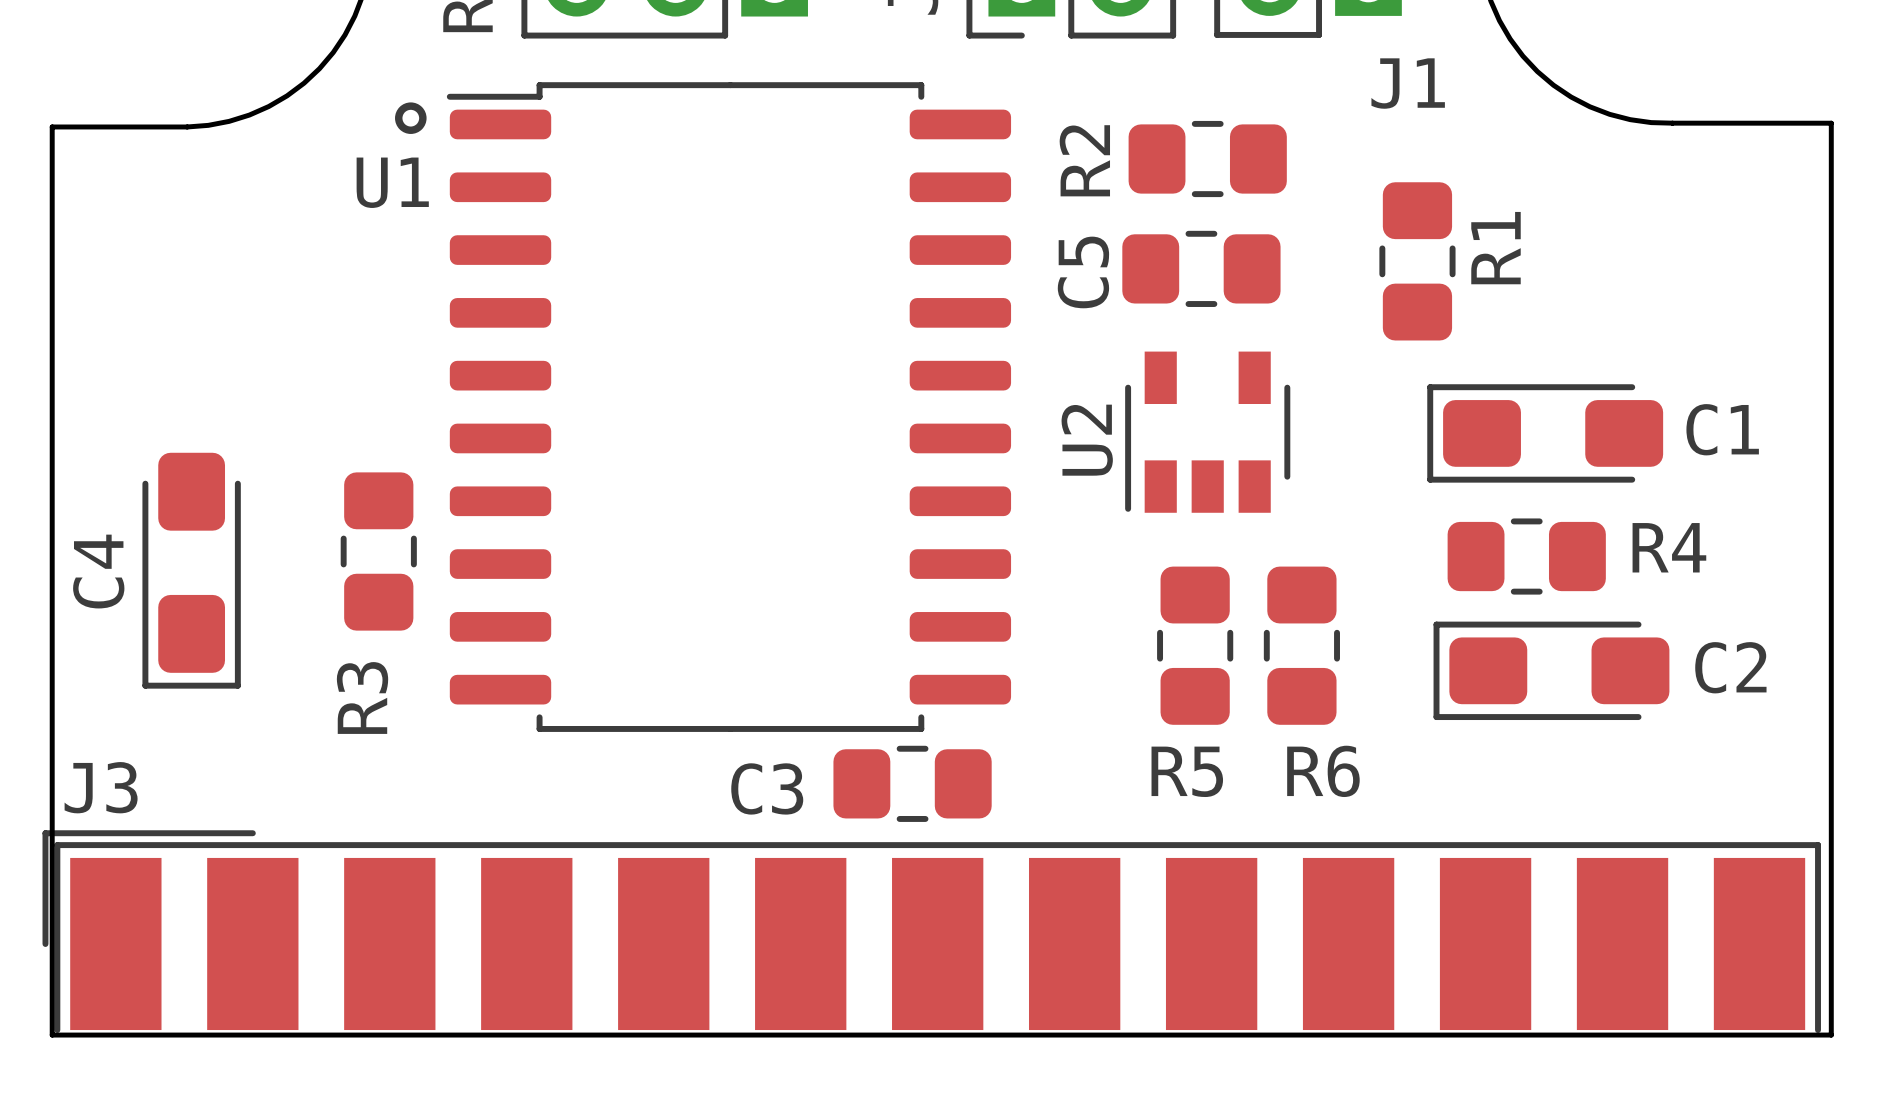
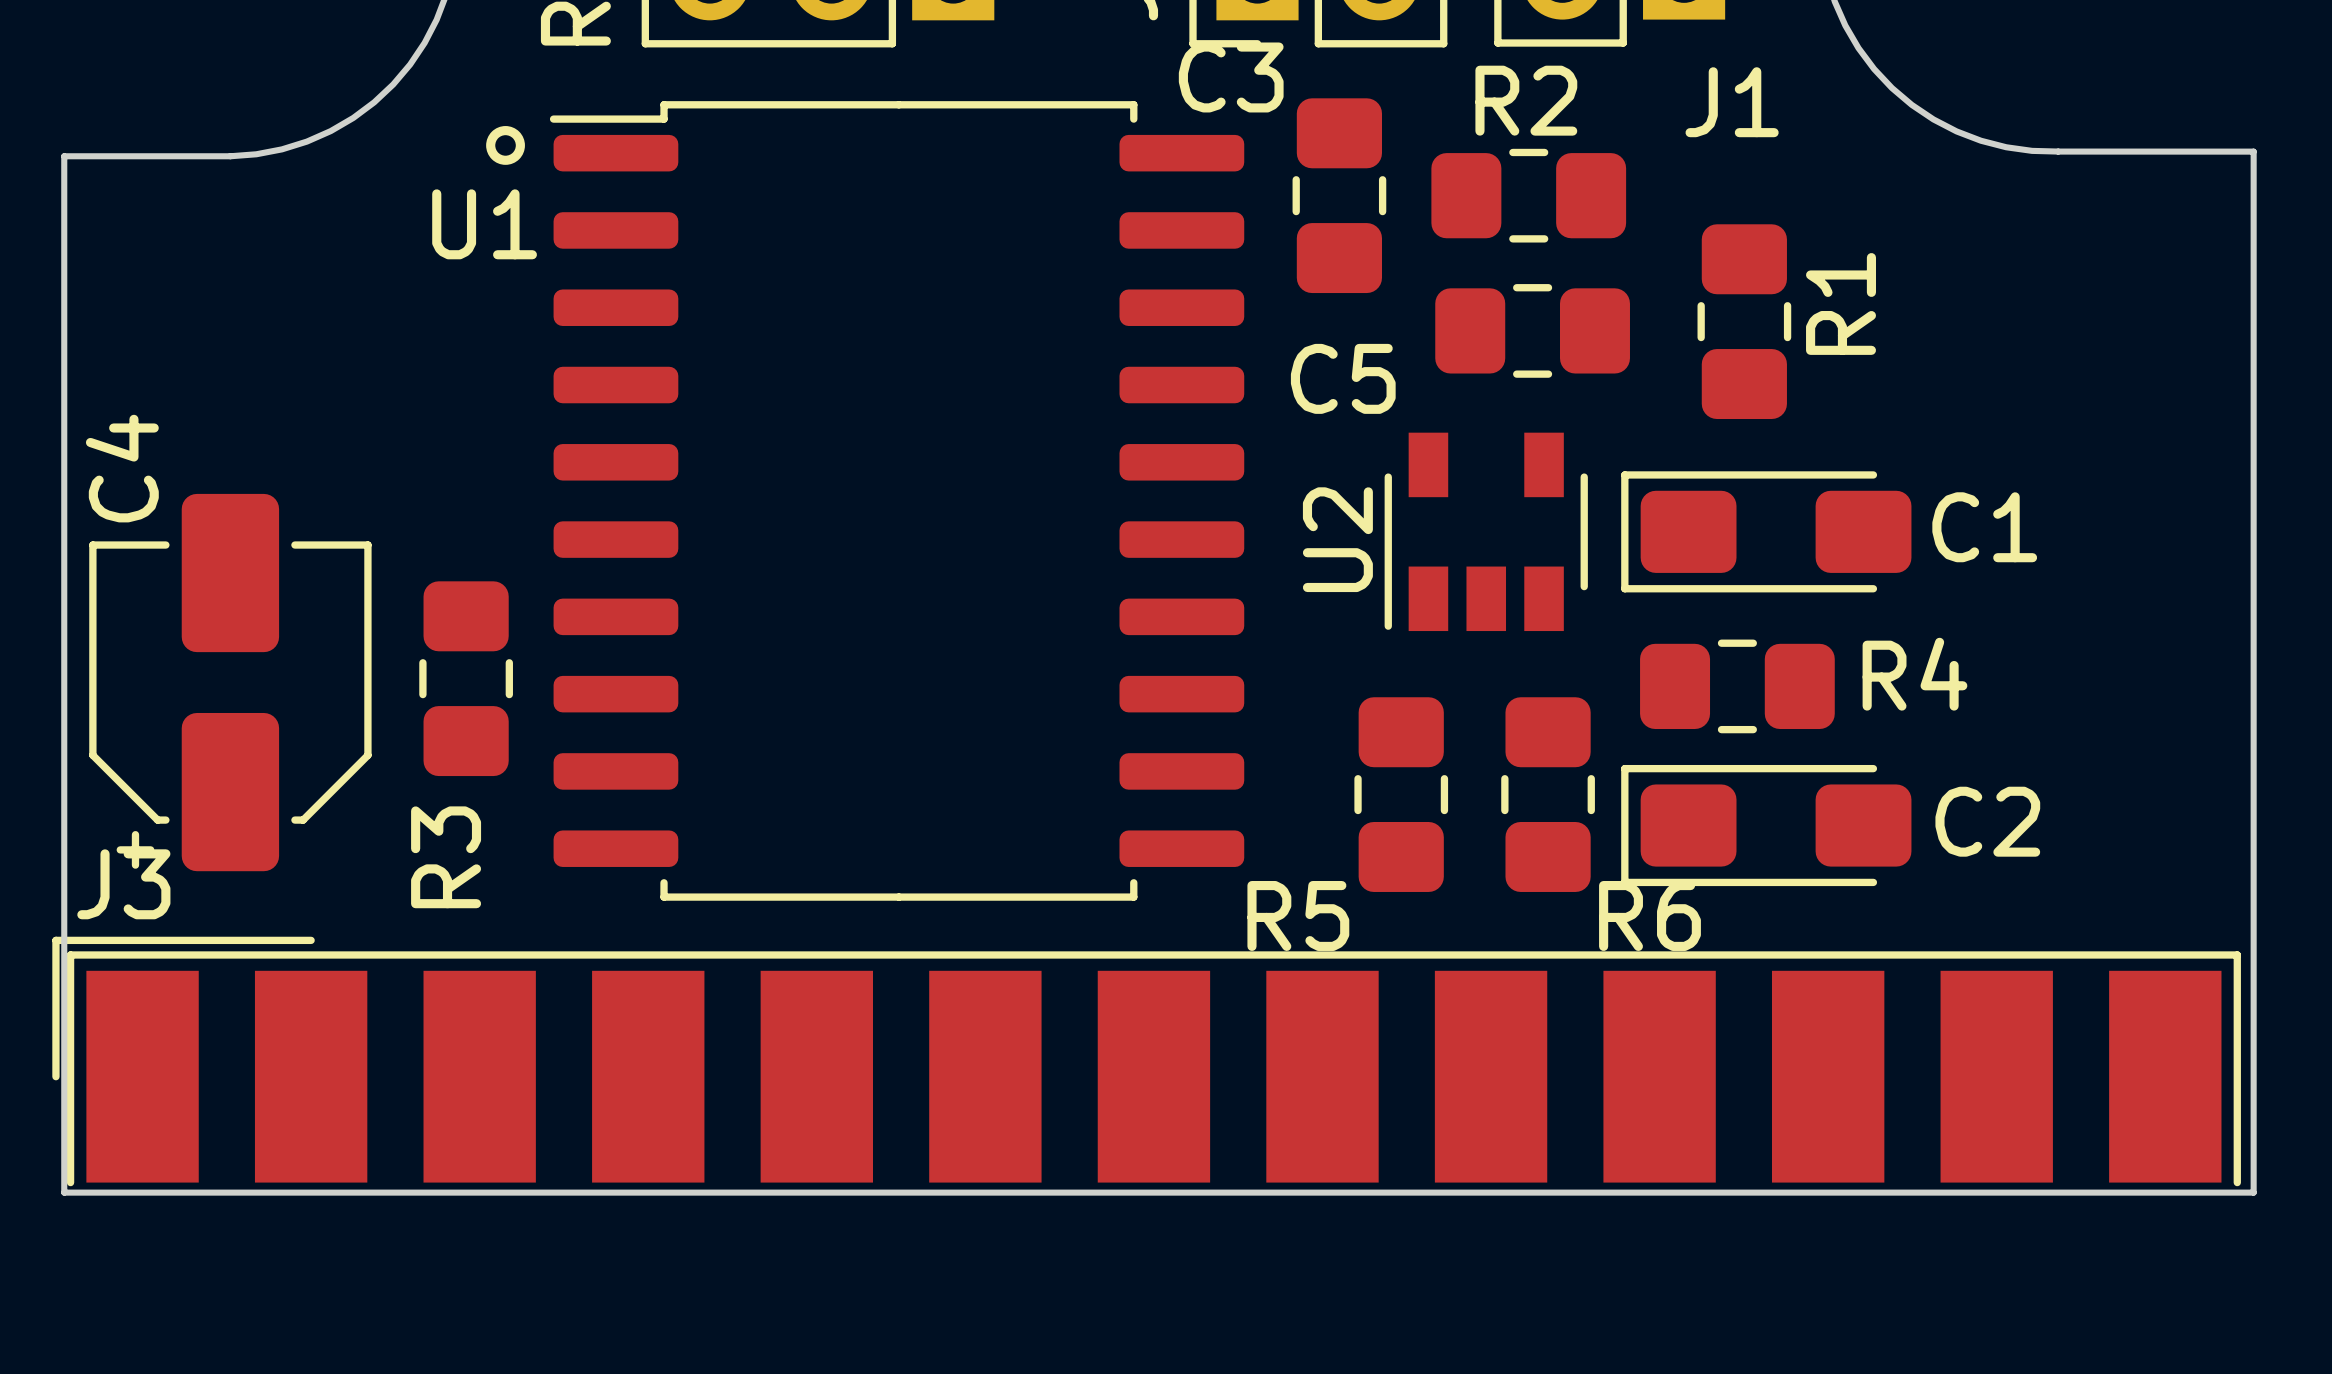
R2 position: (1207, 159) -> (1528, 195)
R2 name rotation: 0° (1084, 160) -> 90° clockwise (1526, 100)
R2 name position: R2 (1084, 160) -> R2 (1526, 100)
C5 position: (1201, 268) -> (1532, 330)
C5 name rotation: 0° (1083, 272) -> 90° clockwise (1343, 378)
C1 position: (1545, 433) -> (1766, 531)
C4 footprint: [142, 452, 241, 689] -> [89, 493, 372, 872]
R4 position: (1526, 556) -> (1737, 686)
C4 name position: C4 (98, 571) -> C4 (122, 468)
R5 position: (1195, 645) -> (1401, 794)
R6 position: (1301, 645) -> (1548, 794)
C2 position: (1551, 670) -> (1766, 825)
R5 name position: R5 (1187, 771) -> R5 (1298, 915)
R6 name position: R6 (1323, 771) -> R6 (1649, 915)
C3 rotation: 0° (912, 783) -> 90° clockwise (1339, 195)
C3 position: (912, 783) -> (1339, 195)
J3 position: (931, 931) -> (1146, 1061)
board edge: (52, 969) (52, 1035) (1831, 1035) (1831, 969) -> (64, 1192) (2253, 1192)

